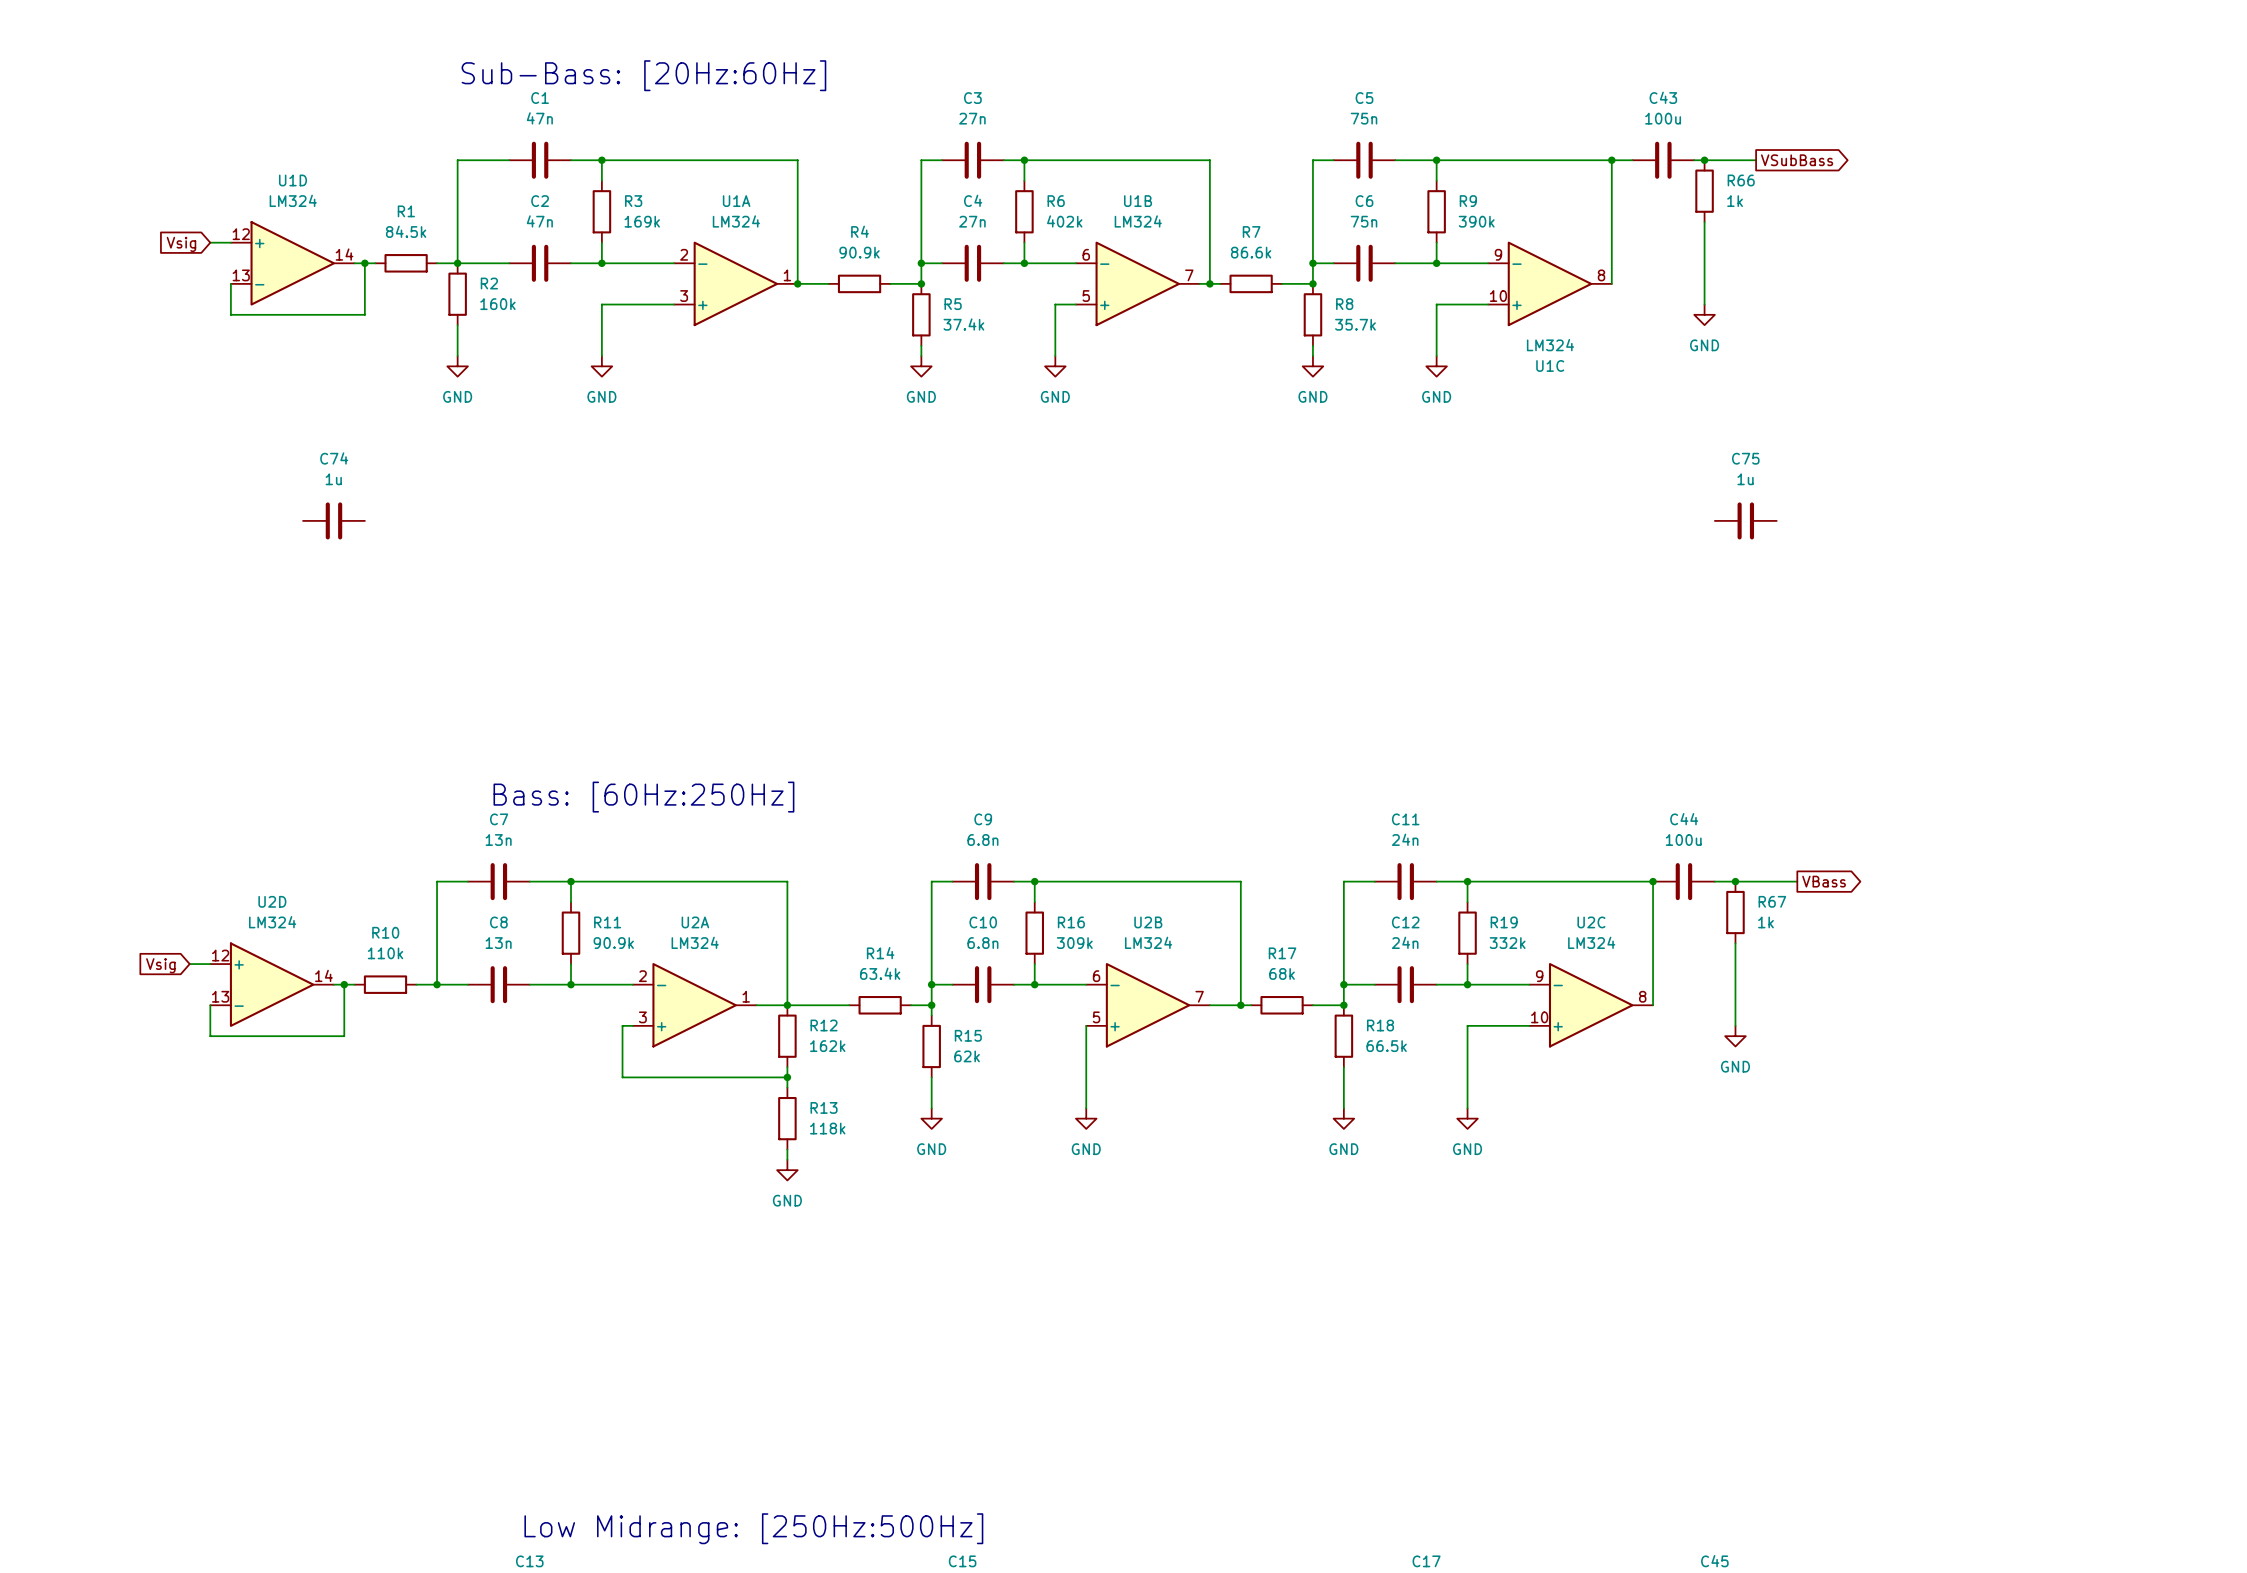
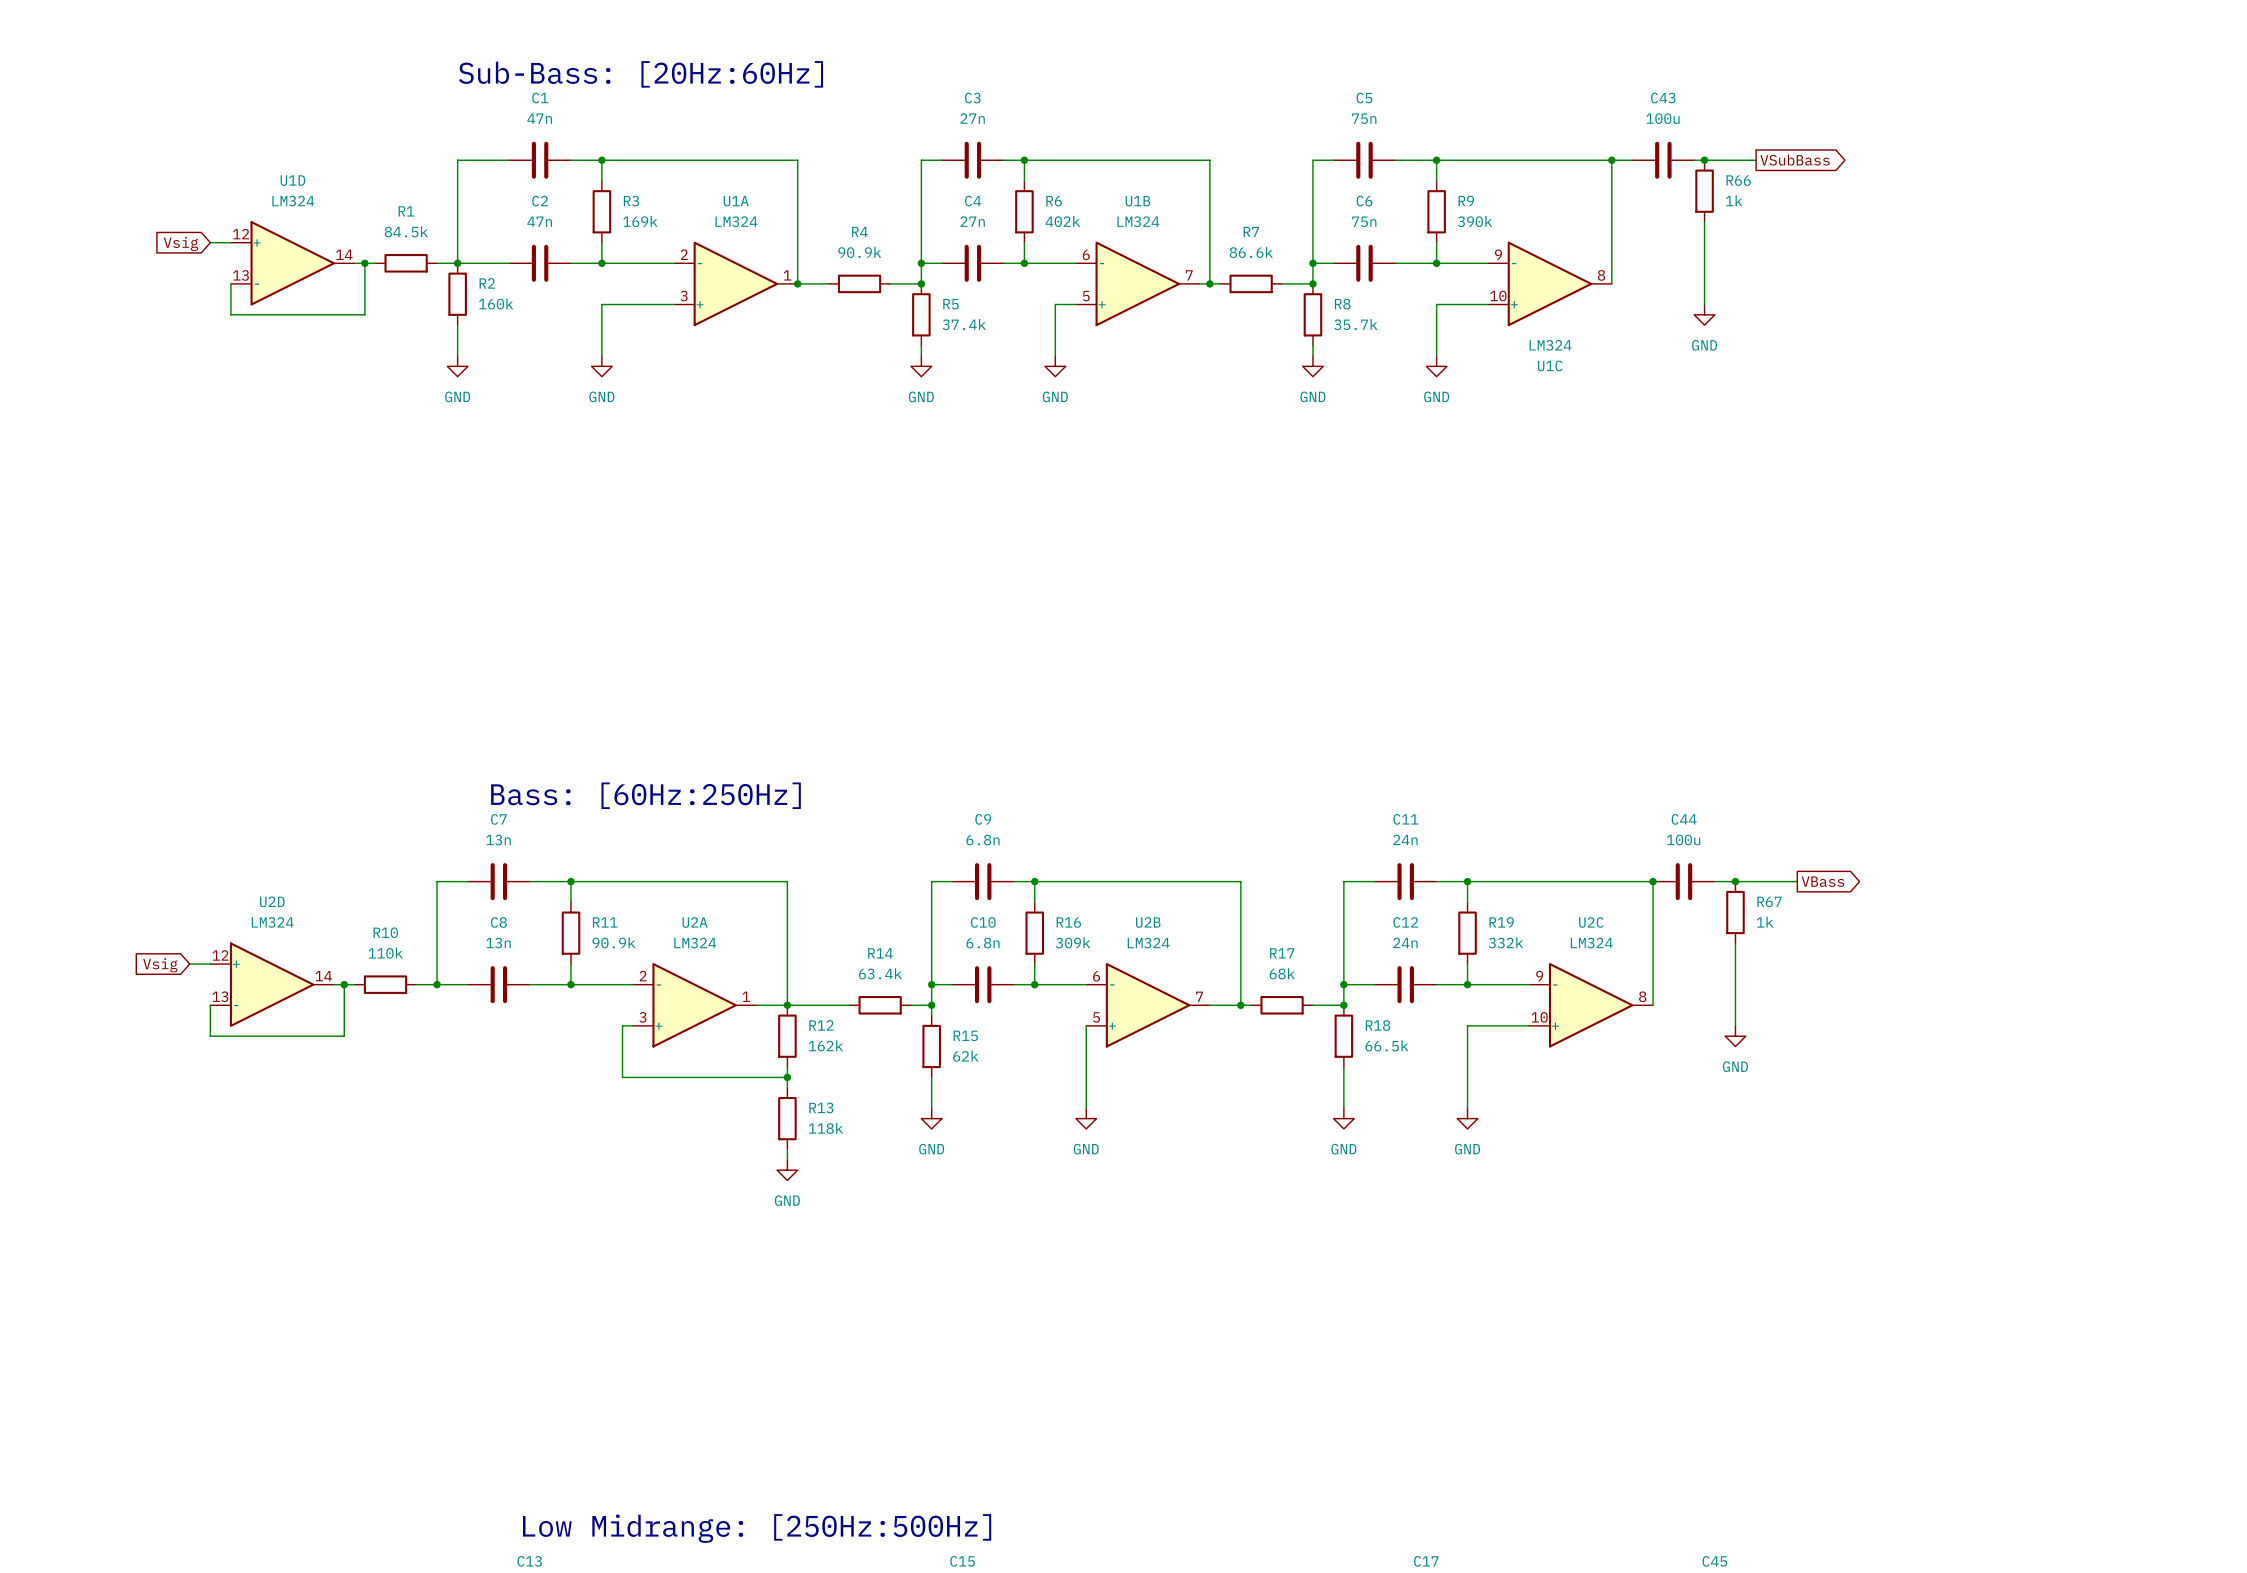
C74: 1u (333, 520) -> none
C75: 1u (1745, 520) -> none

